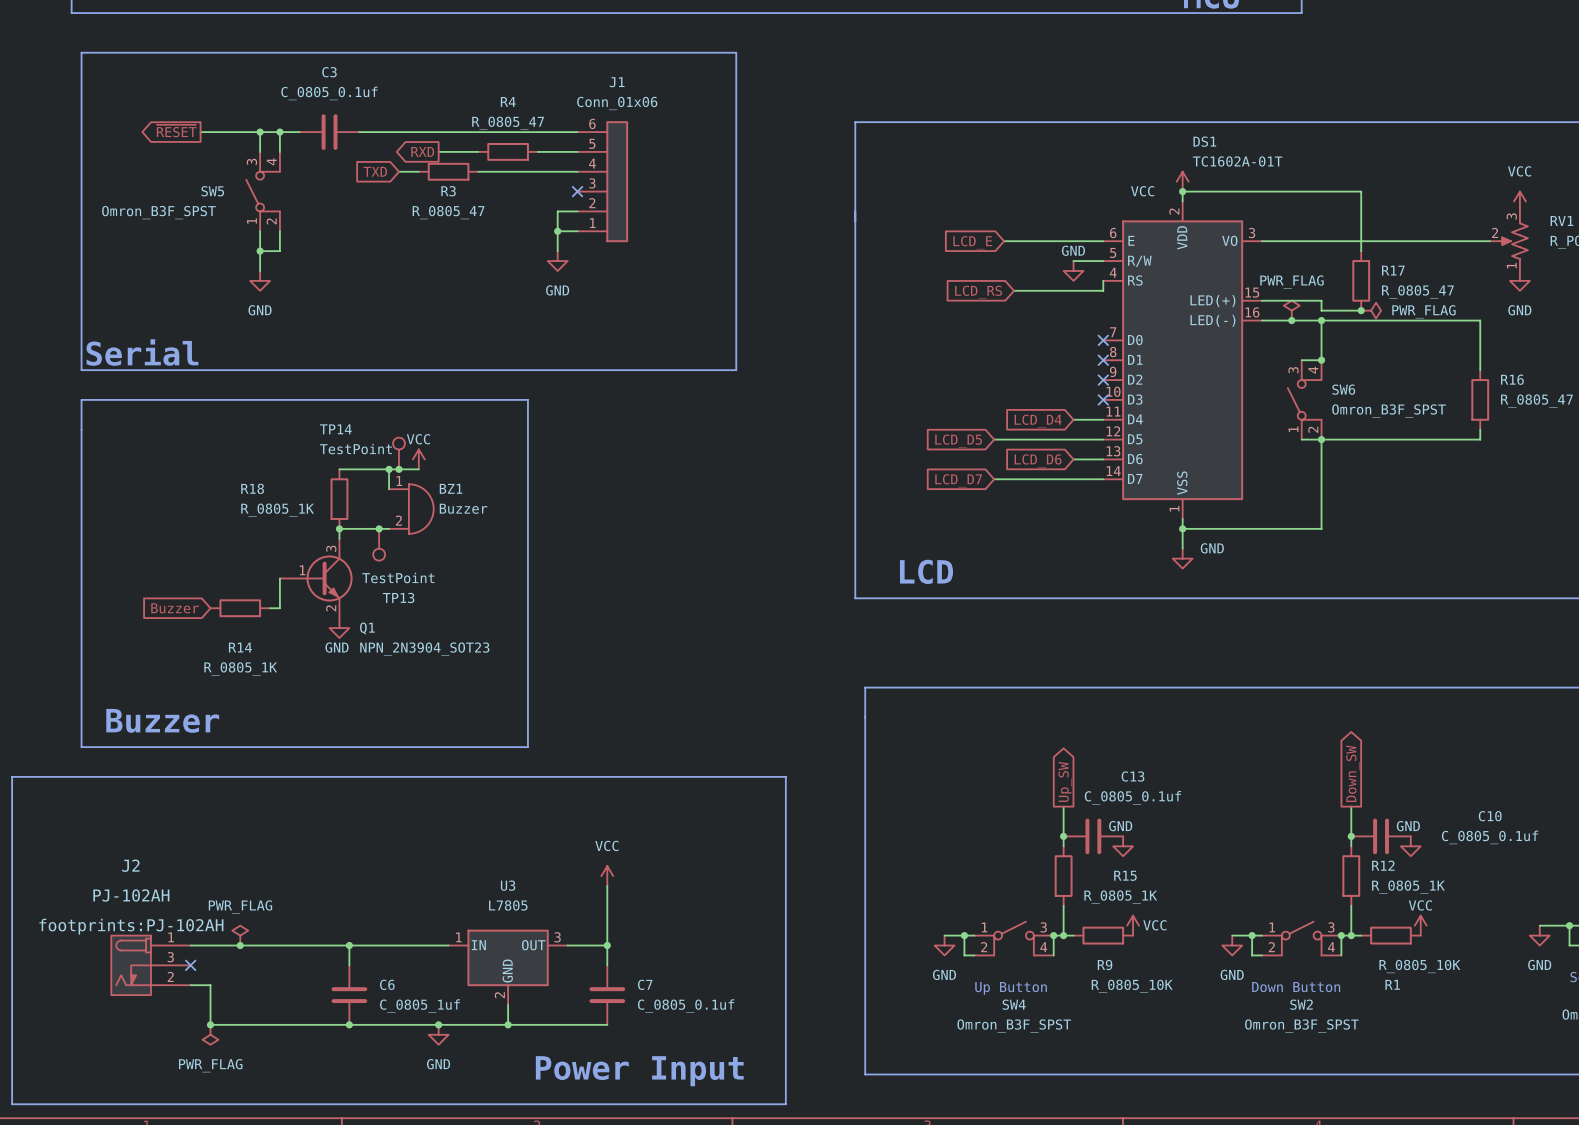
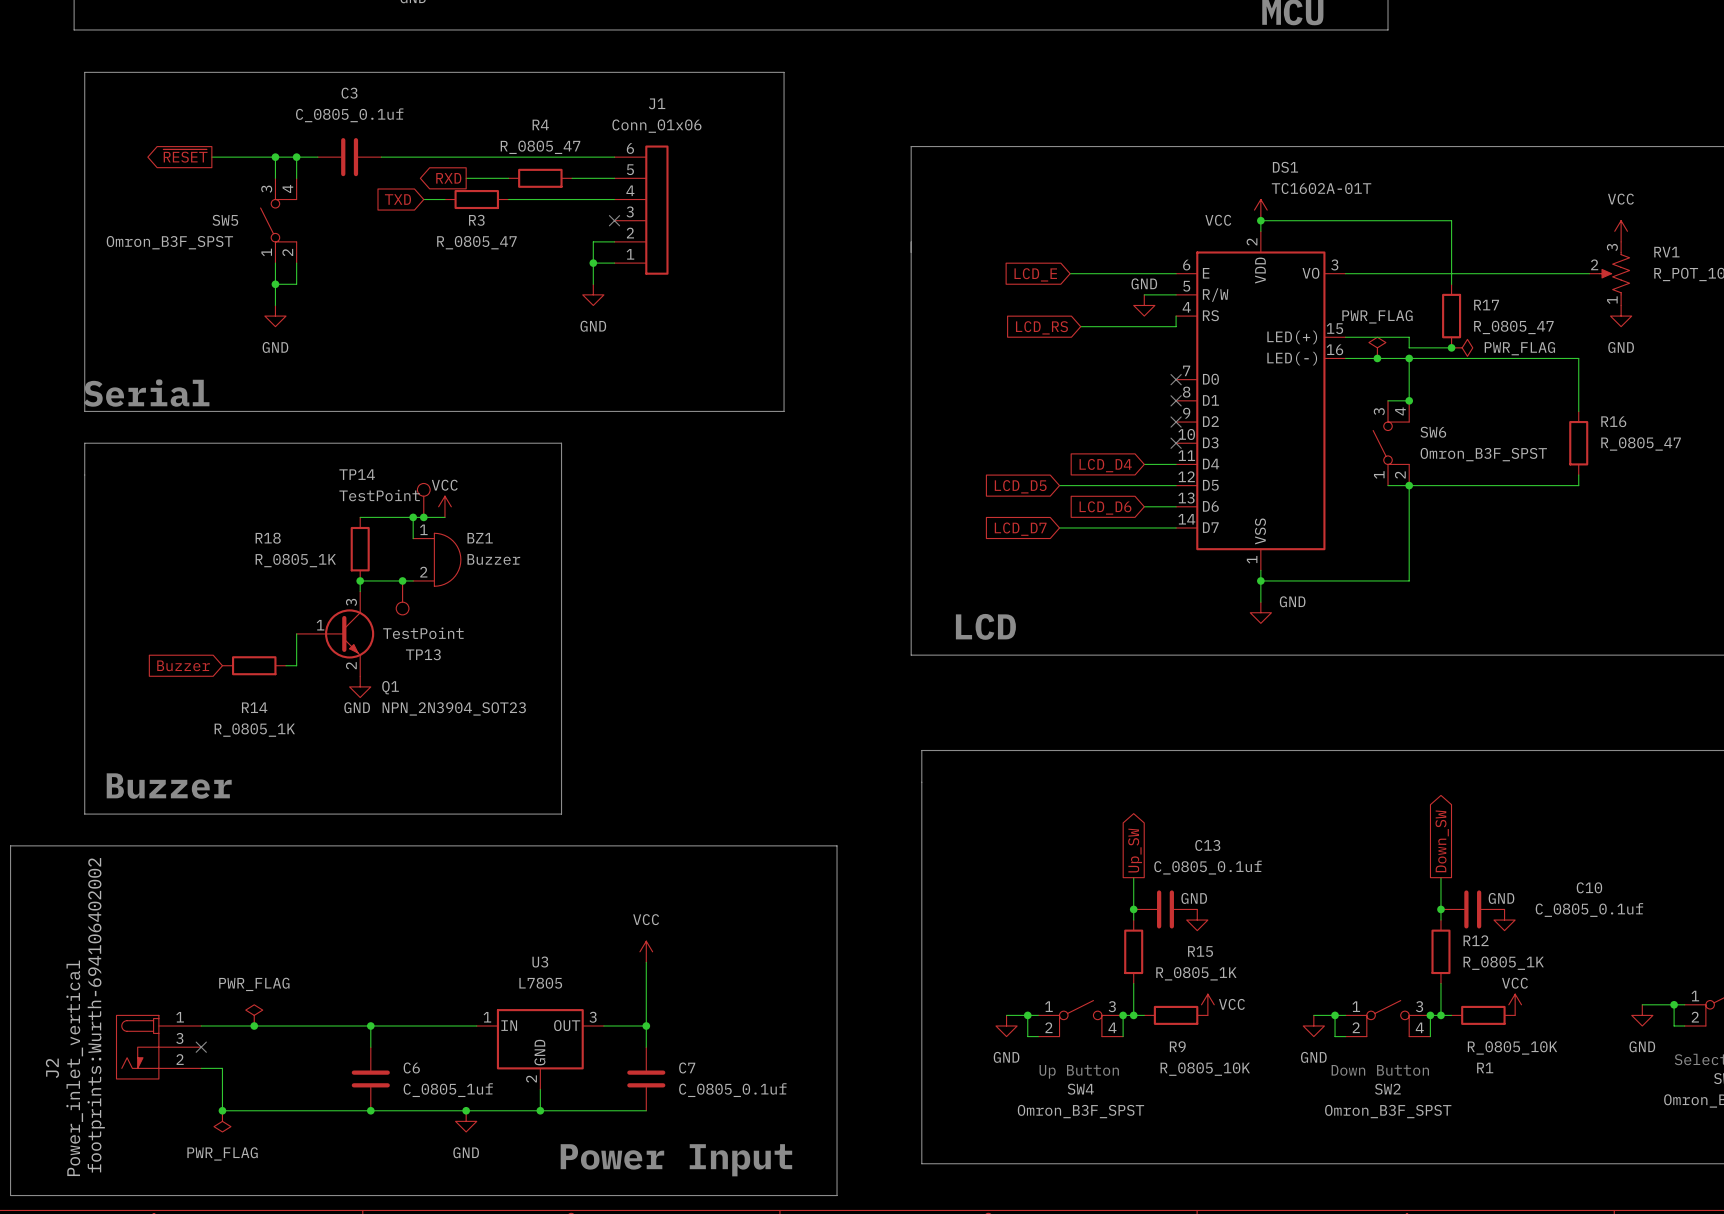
J2 name rotation: 0° (130, 865) -> 90° counterclockwise (52, 1068)
J2 name position: J2 (130, 865) -> J2 (52, 1068)
J2 value: PJ-102AH (131, 895) -> Power_inlet_vertical (74, 1068)
J2 text: footprints:PJ-102AH (131, 926) -> footprints:Wurth-694106402002 (96, 1015)

